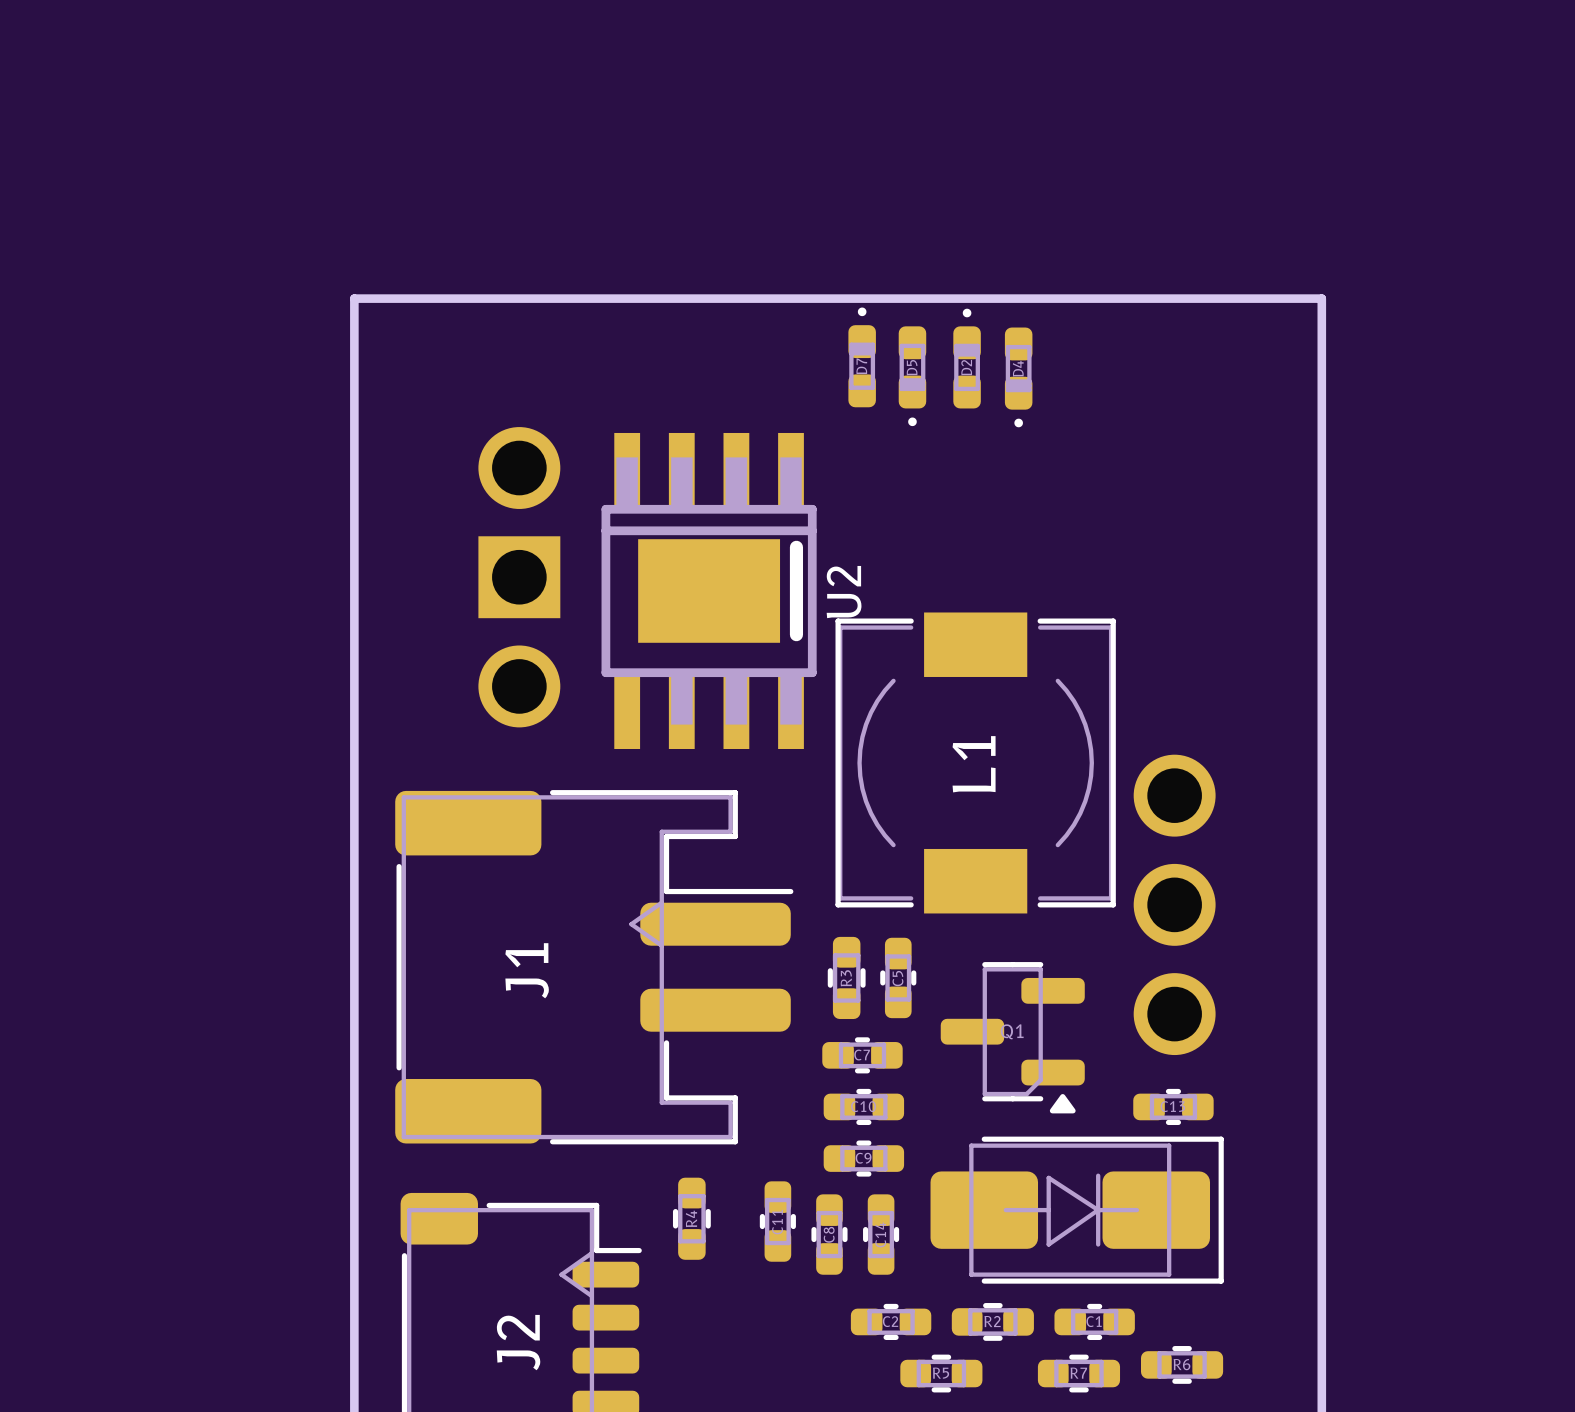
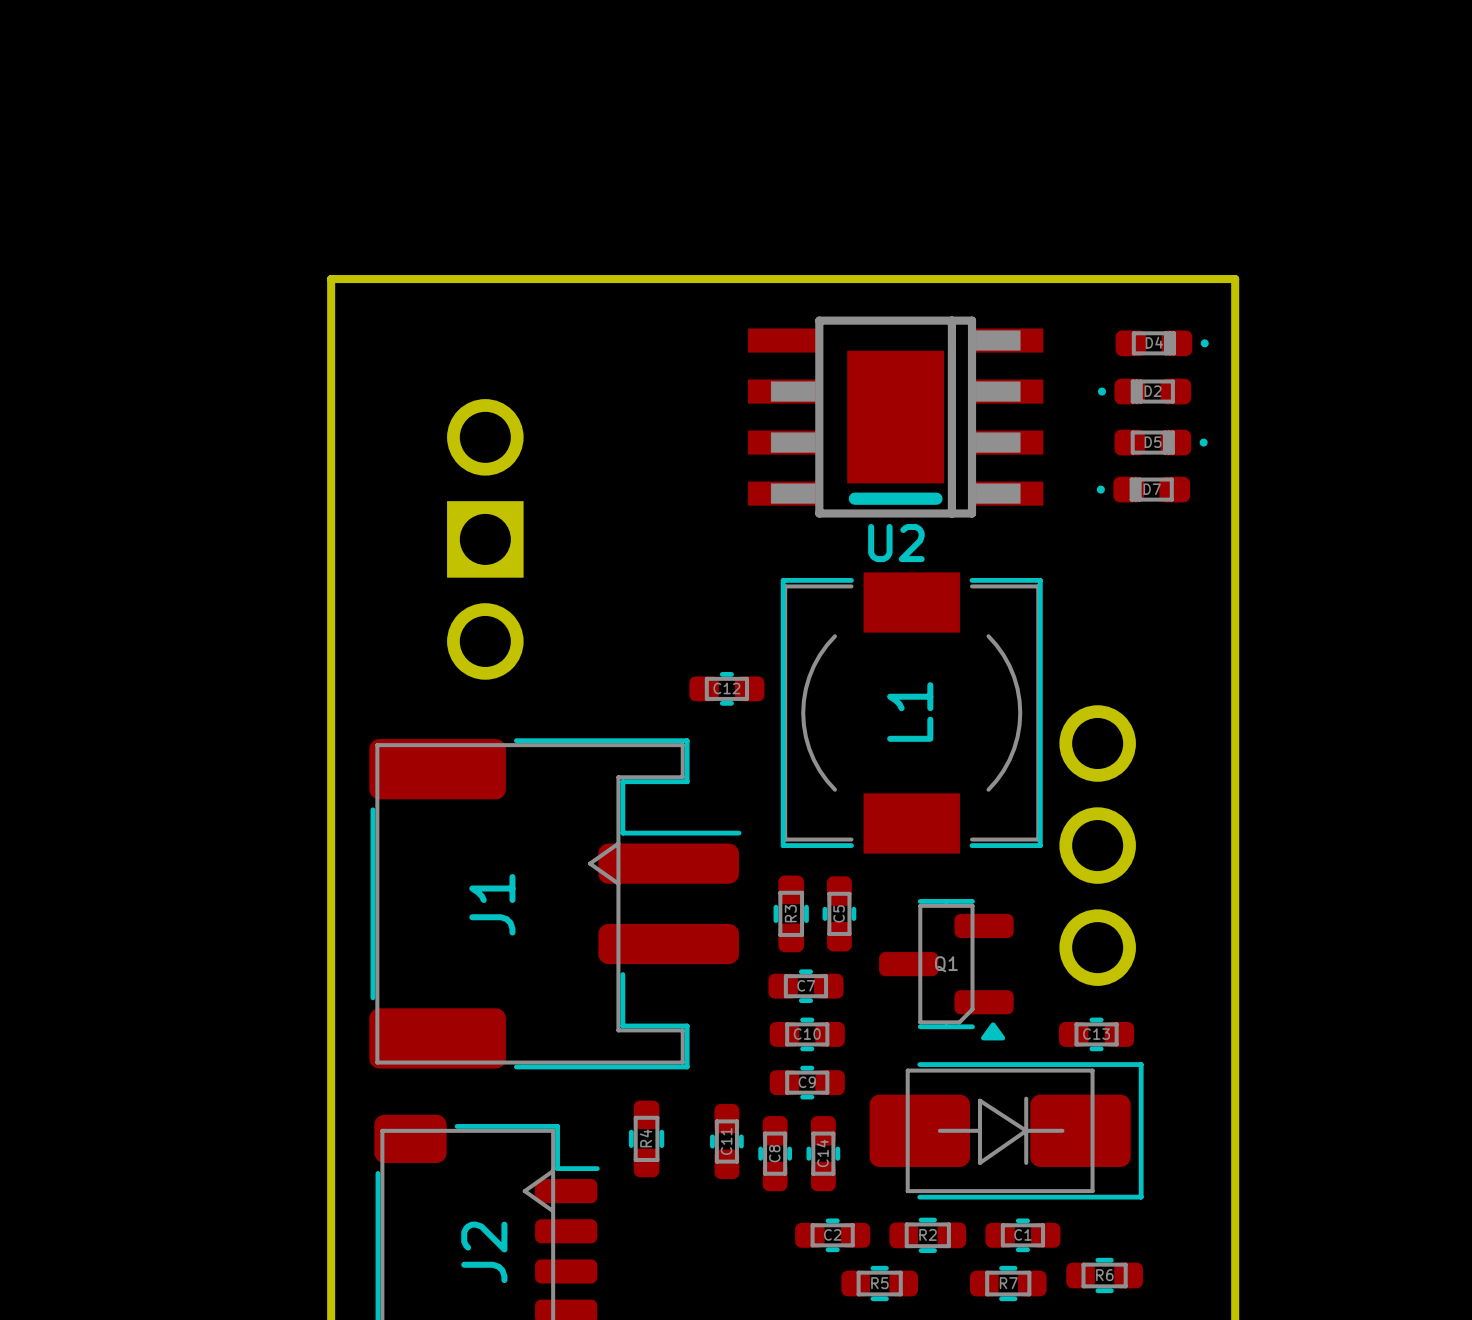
D7 rotation: 0° (862, 357) -> 90° counterclockwise (1143, 489)
D7 position: (862, 357) -> (1143, 489)
D2 rotation: 0° (967, 358) -> 90° counterclockwise (1144, 391)
D2 position: (967, 358) -> (1144, 391)
D5 rotation: 0° (912, 376) -> 90° counterclockwise (1161, 442)
D5 position: (912, 376) -> (1161, 442)
D4 rotation: 0° (1018, 377) -> 90° counterclockwise (1162, 343)
D4 position: (1018, 377) -> (1162, 343)
U2 rotation: 0° (709, 590) -> 90° clockwise (895, 417)
U2 position: (709, 590) -> (895, 417)
C12: none -> (726, 688)

